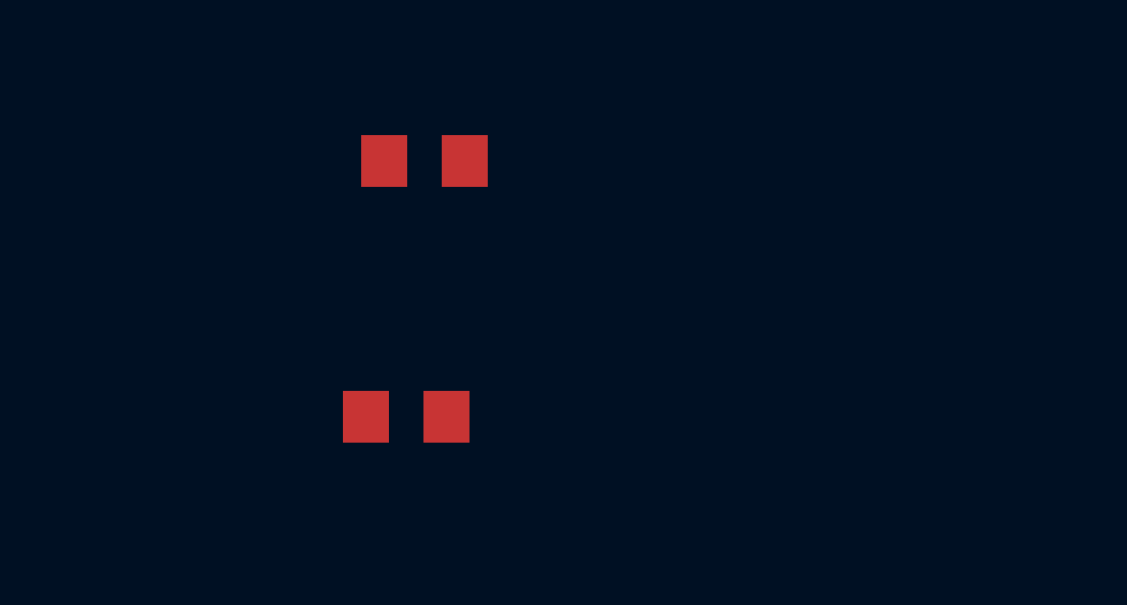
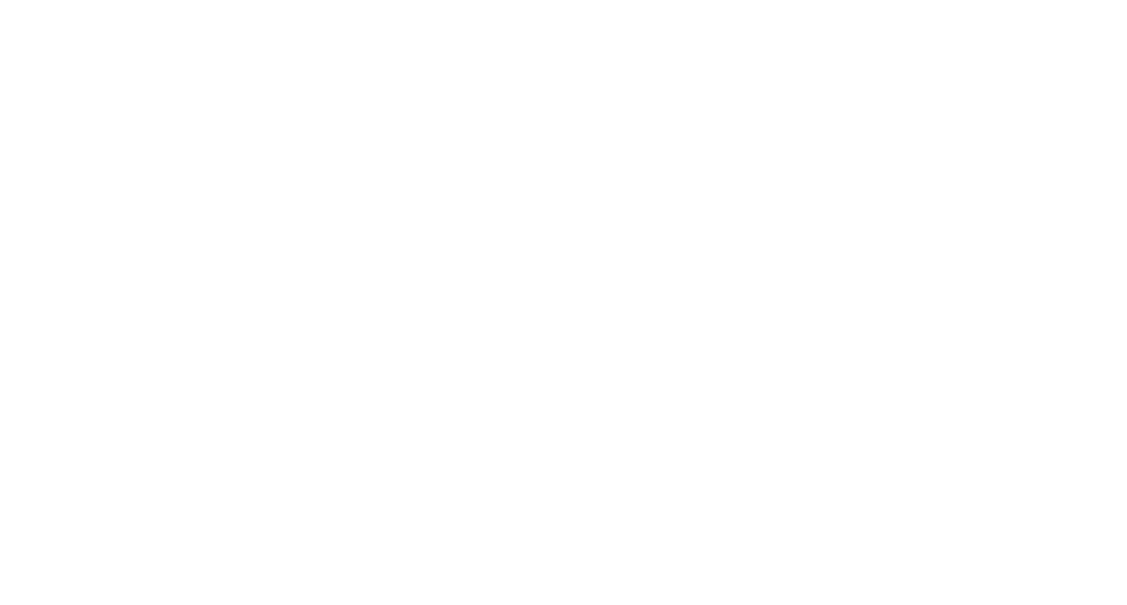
part: (424, 160) -> none
part: (406, 416) -> none

